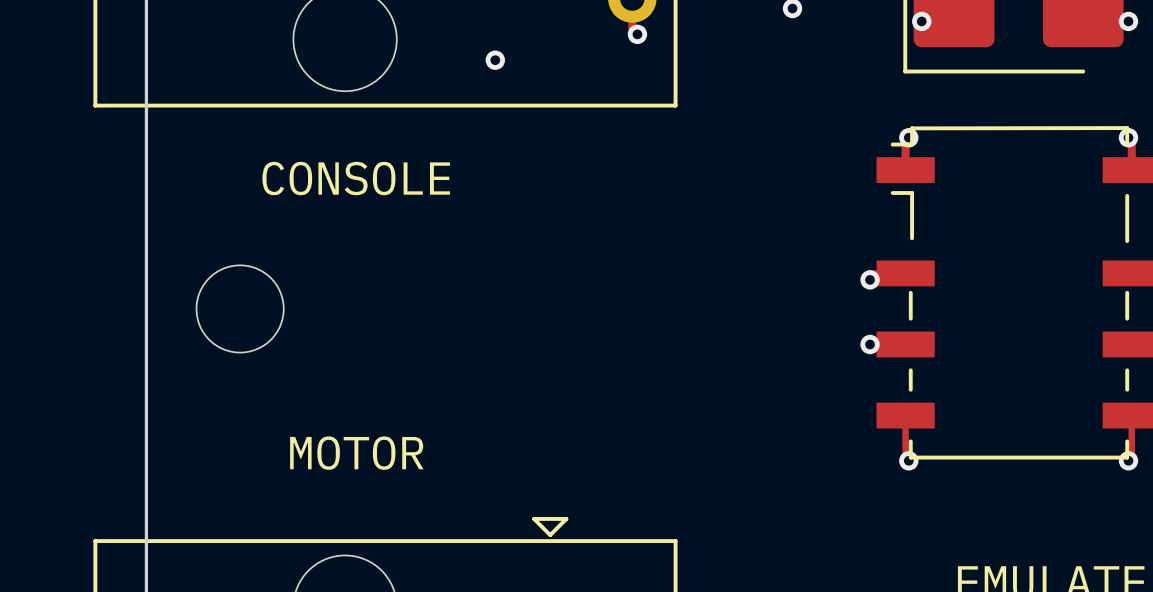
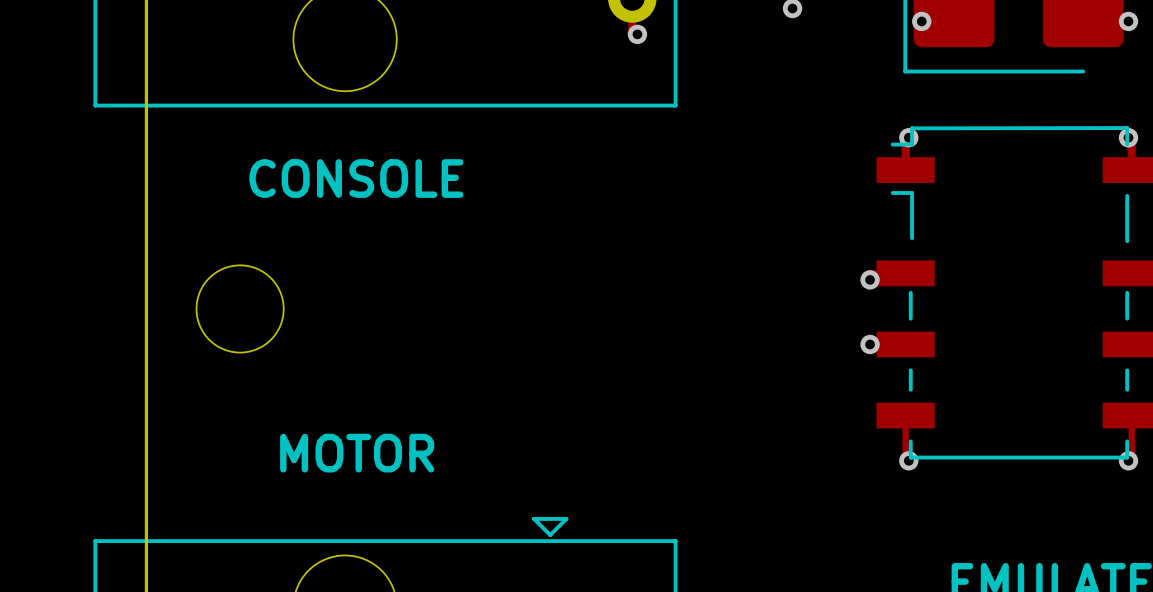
via: (495, 60) -> none

